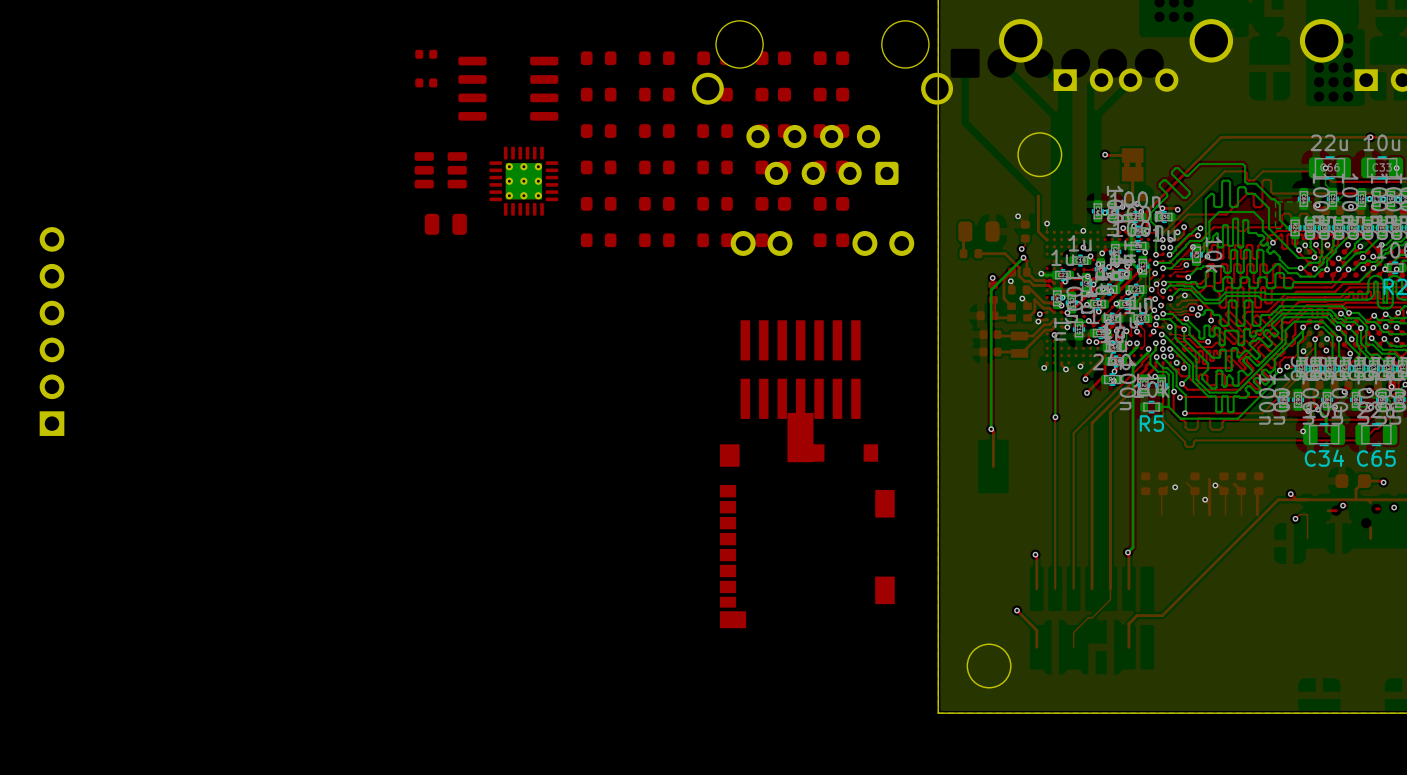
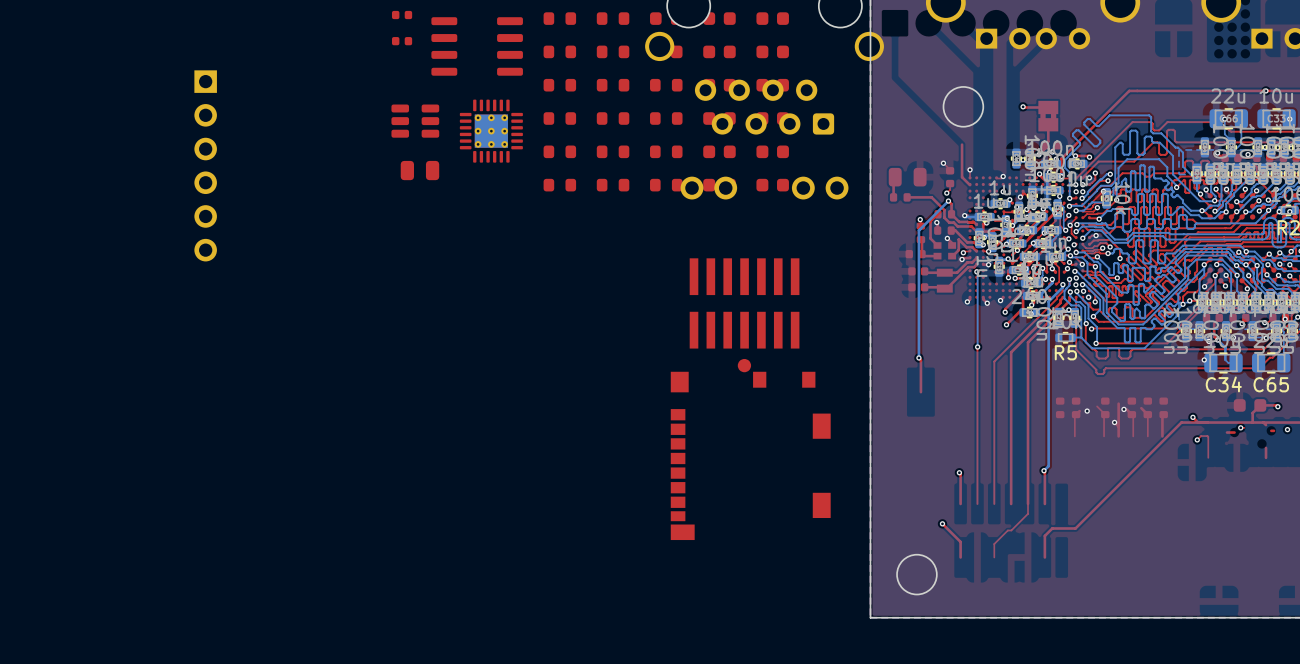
part rotation: 0° (52, 331) -> 180° (205, 165)
part position: (52, 331) -> (205, 165)
part footprint: [787, 412, 814, 463] -> [737, 358, 752, 373]

